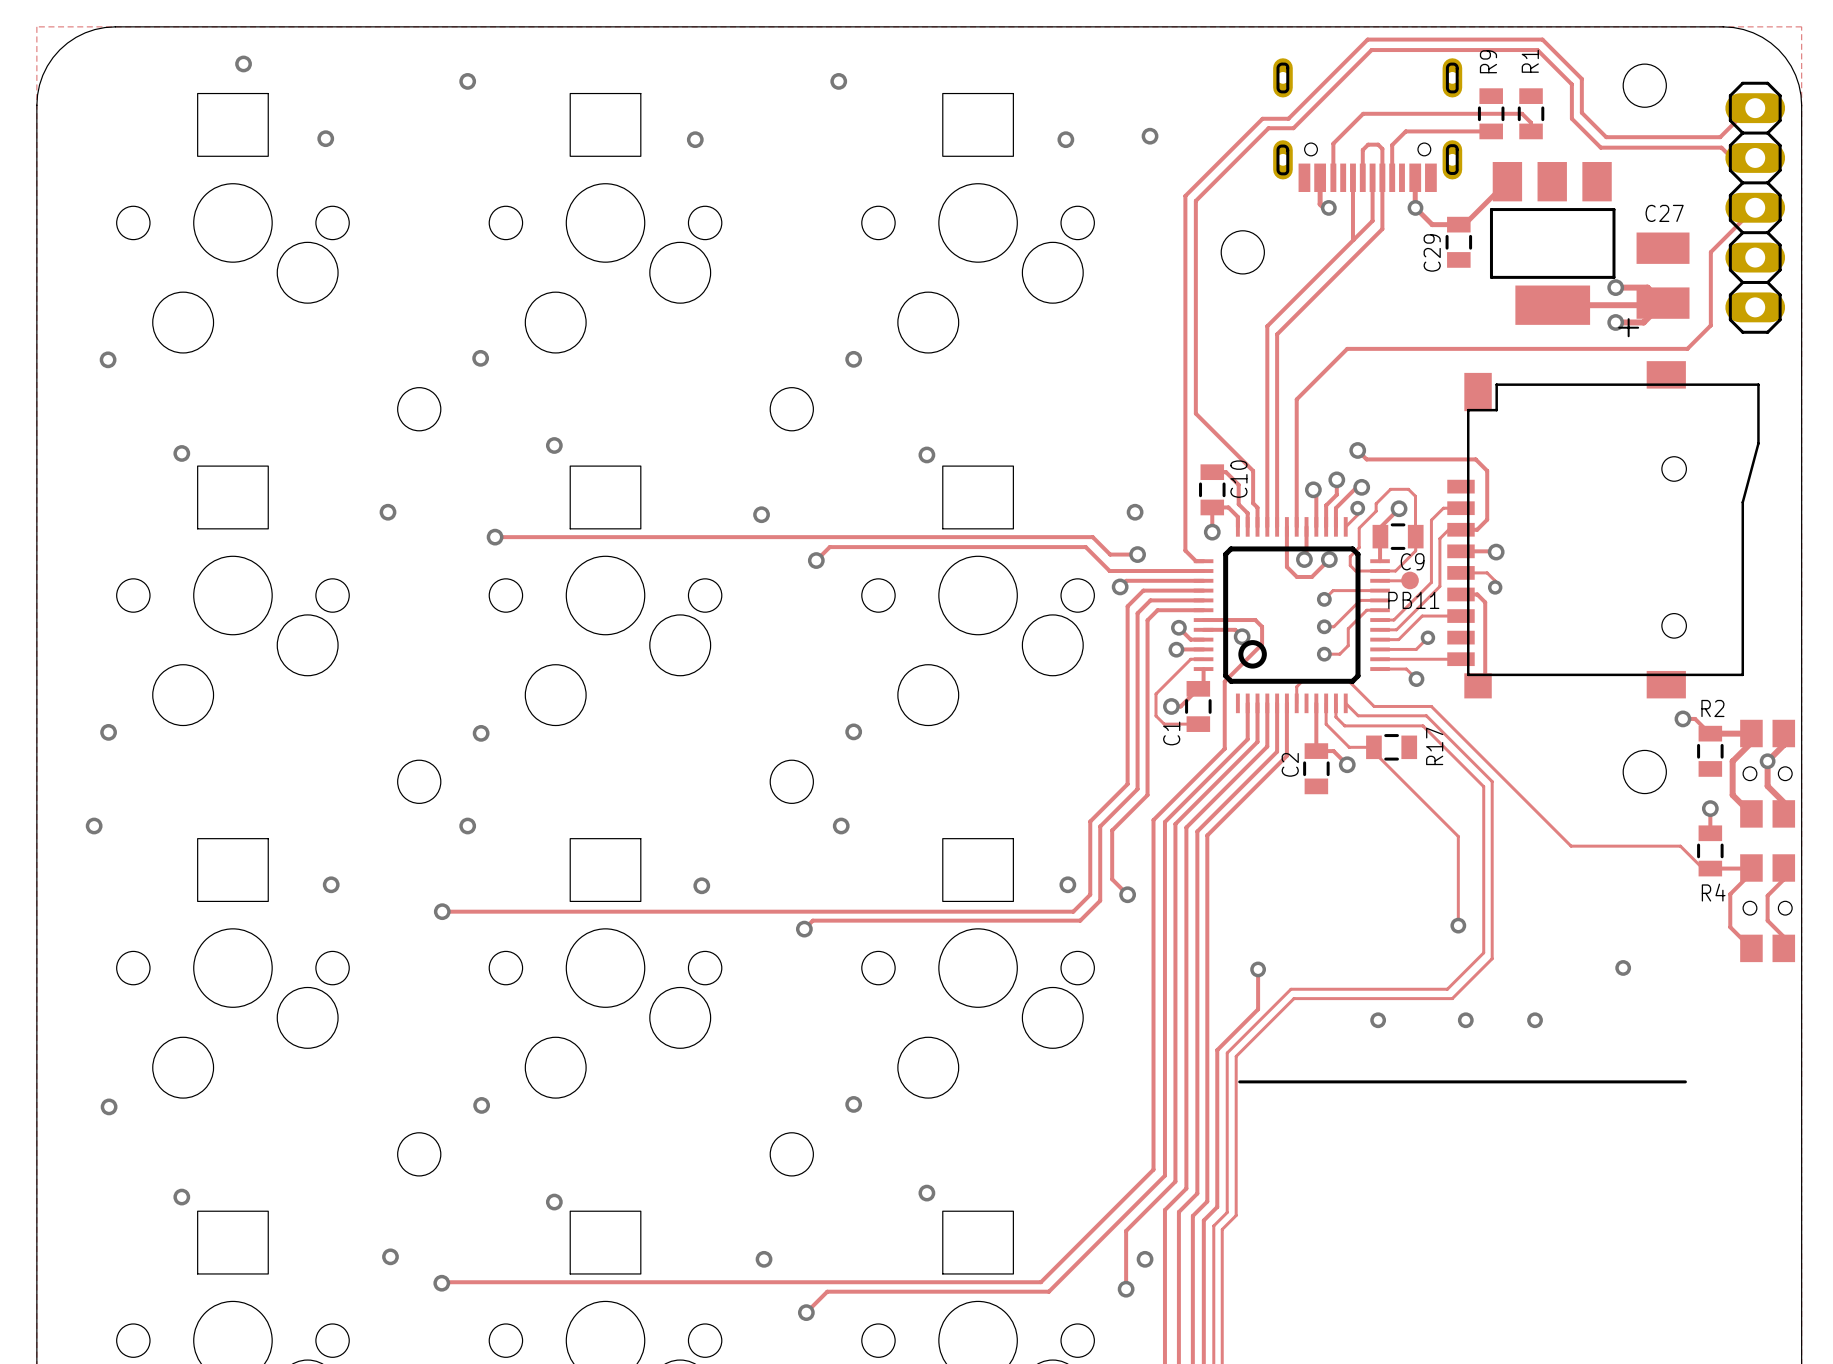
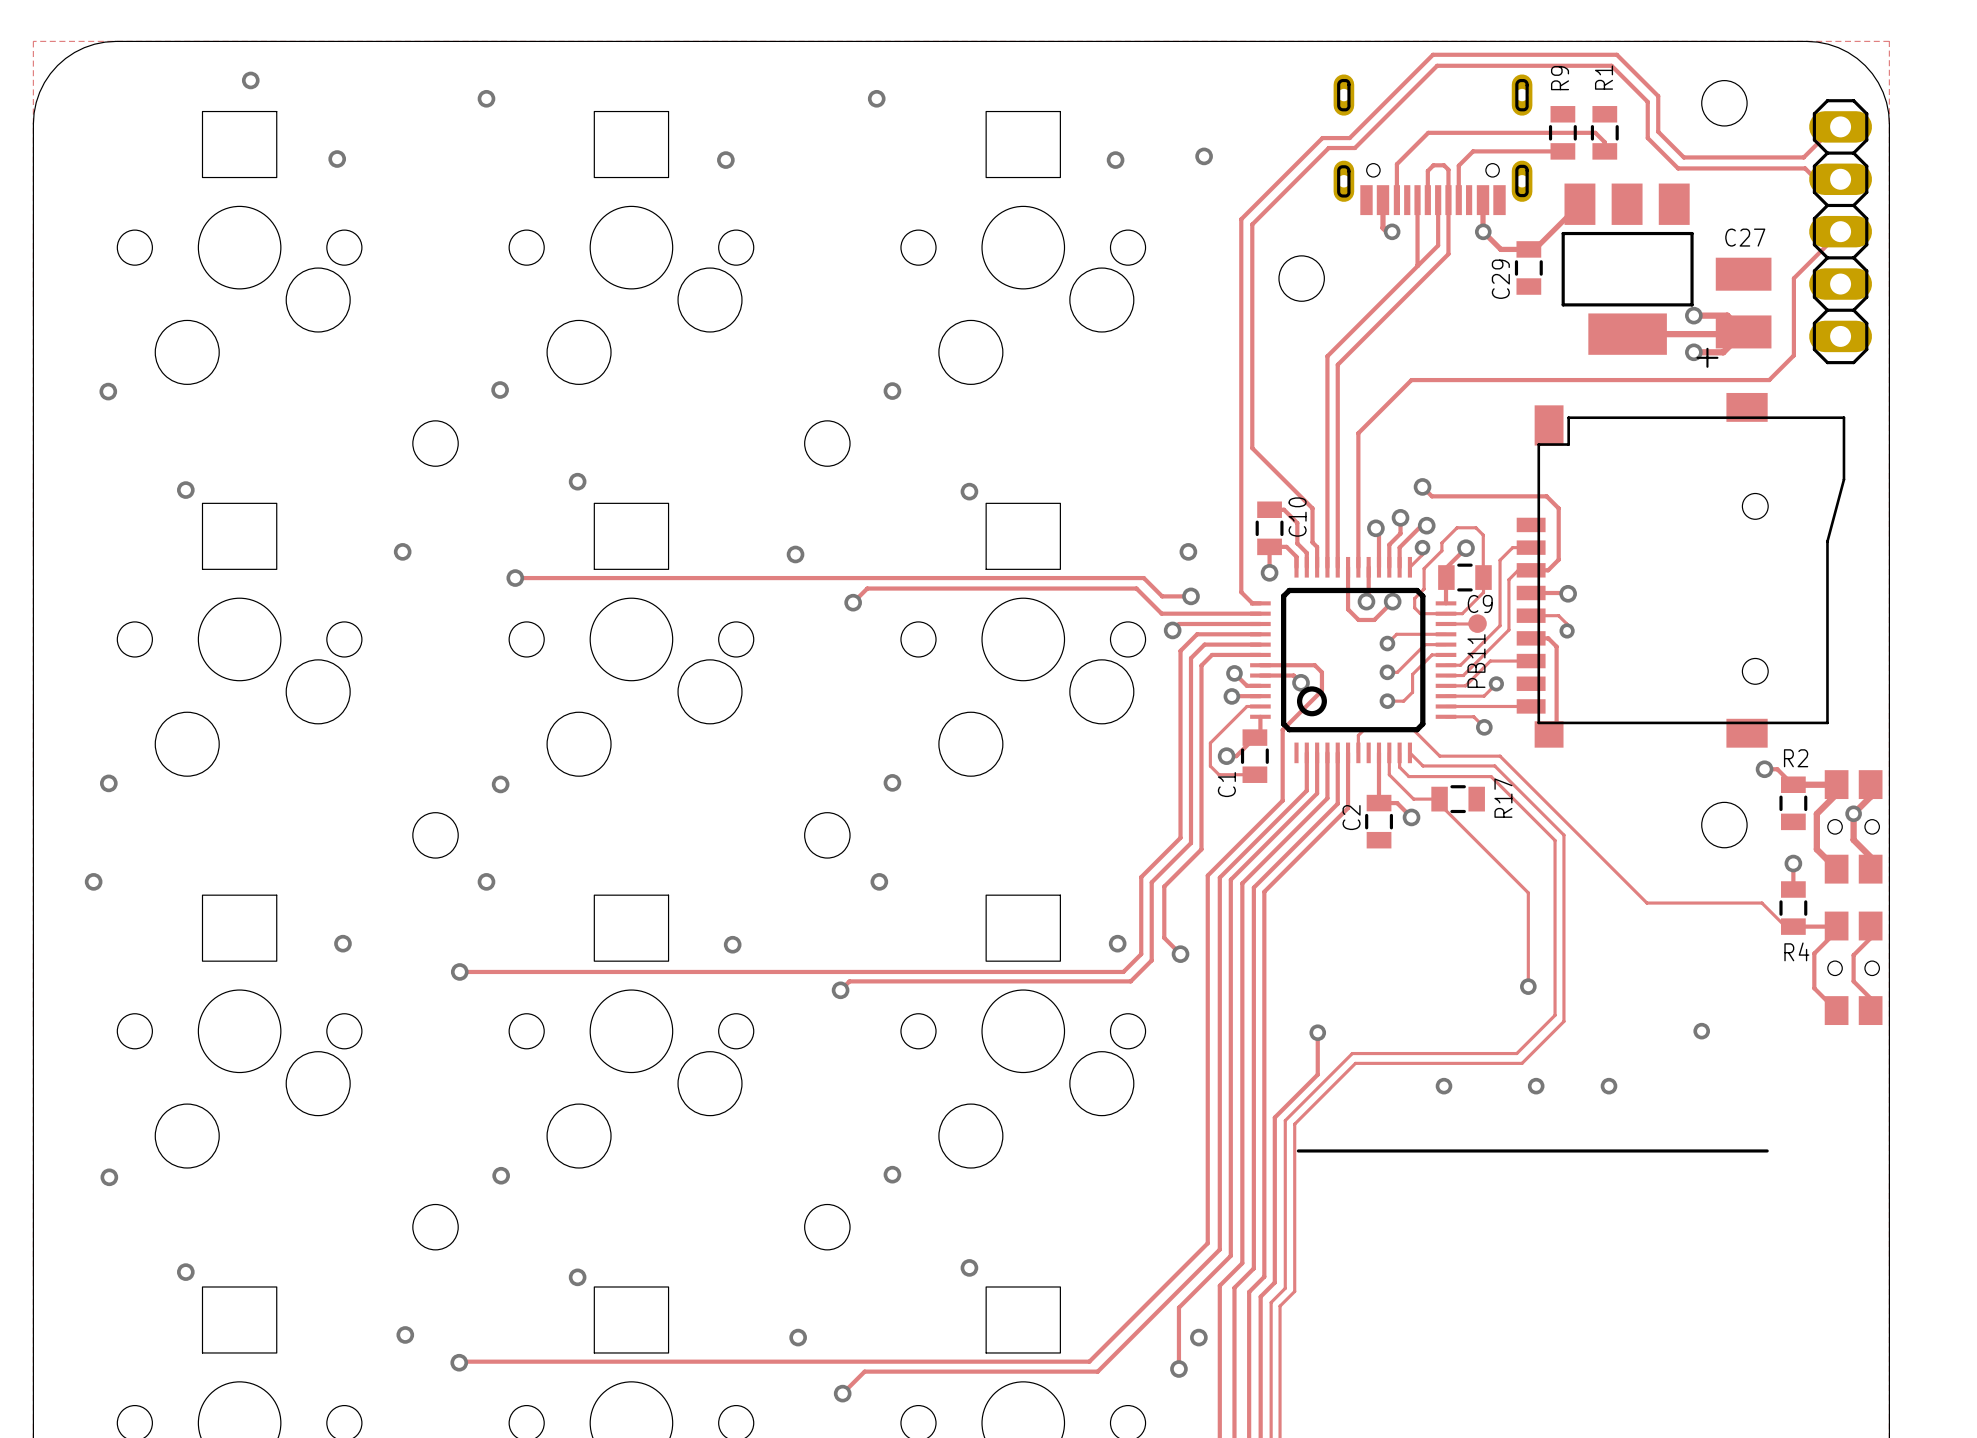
text rotation: 0° (1413, 600) -> 90° counterclockwise (1476, 661)

